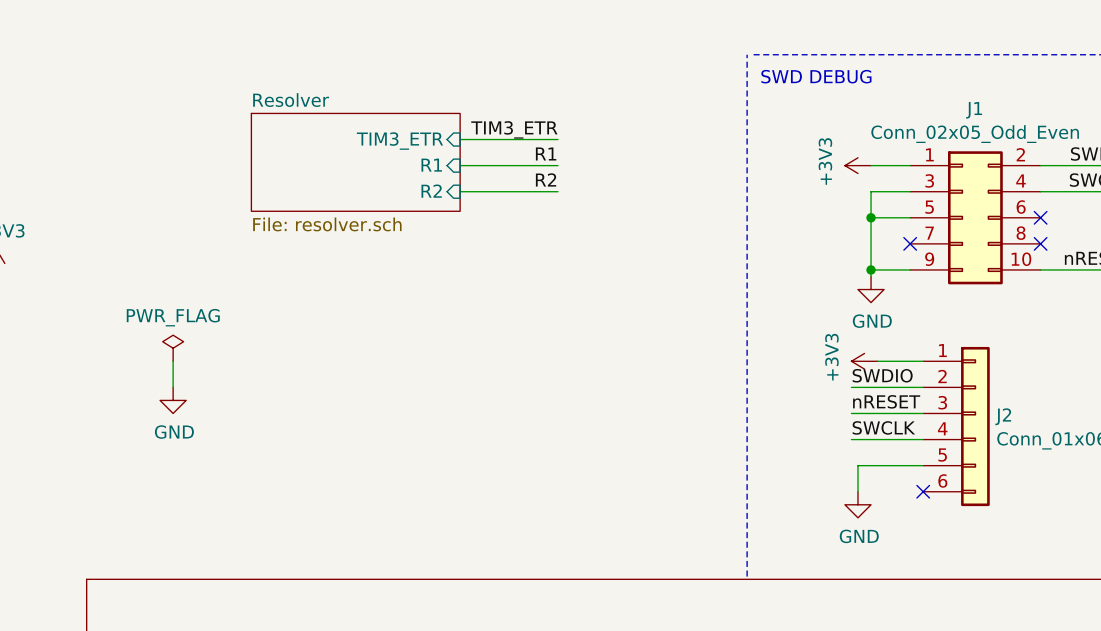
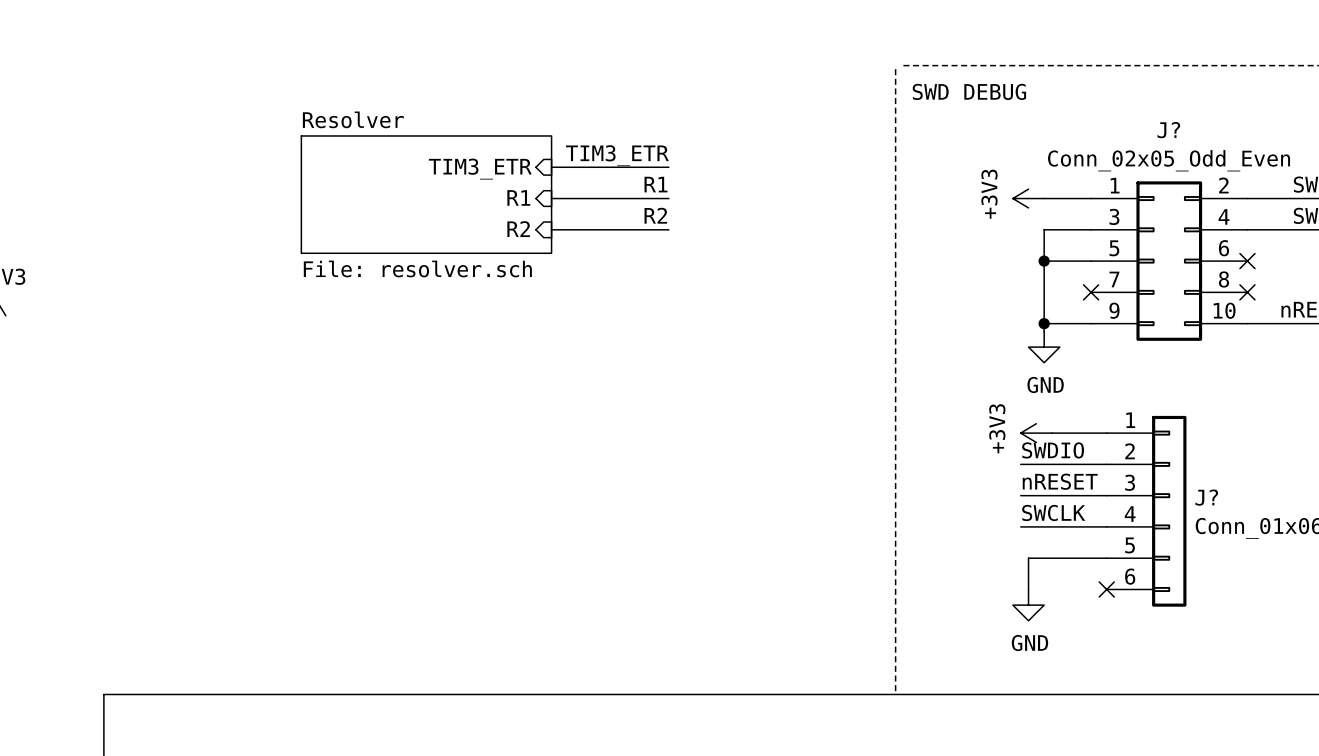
J1 name: J1 (974, 110) -> J? (1168, 130)
power symbol: PWR_FLAG (173, 348) -> none
wire: (173, 361) (173, 387) -> none
power symbol: GND (173, 400) -> none
J2 name: J2 (1003, 416) -> J? (1206, 497)

